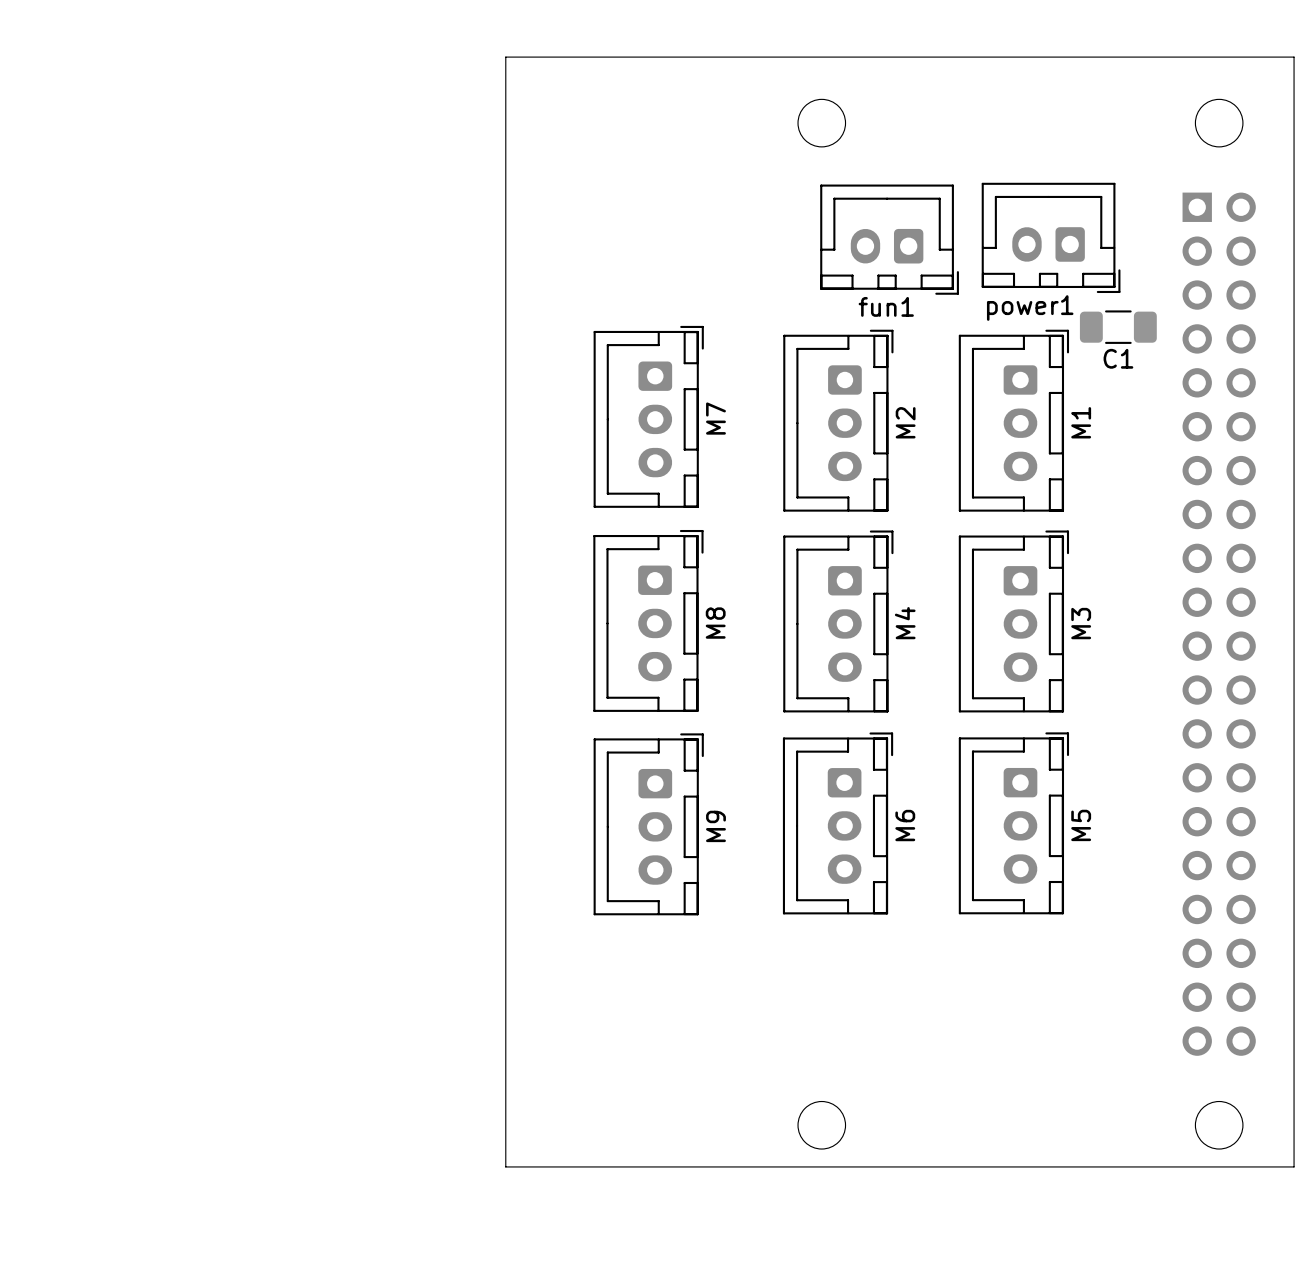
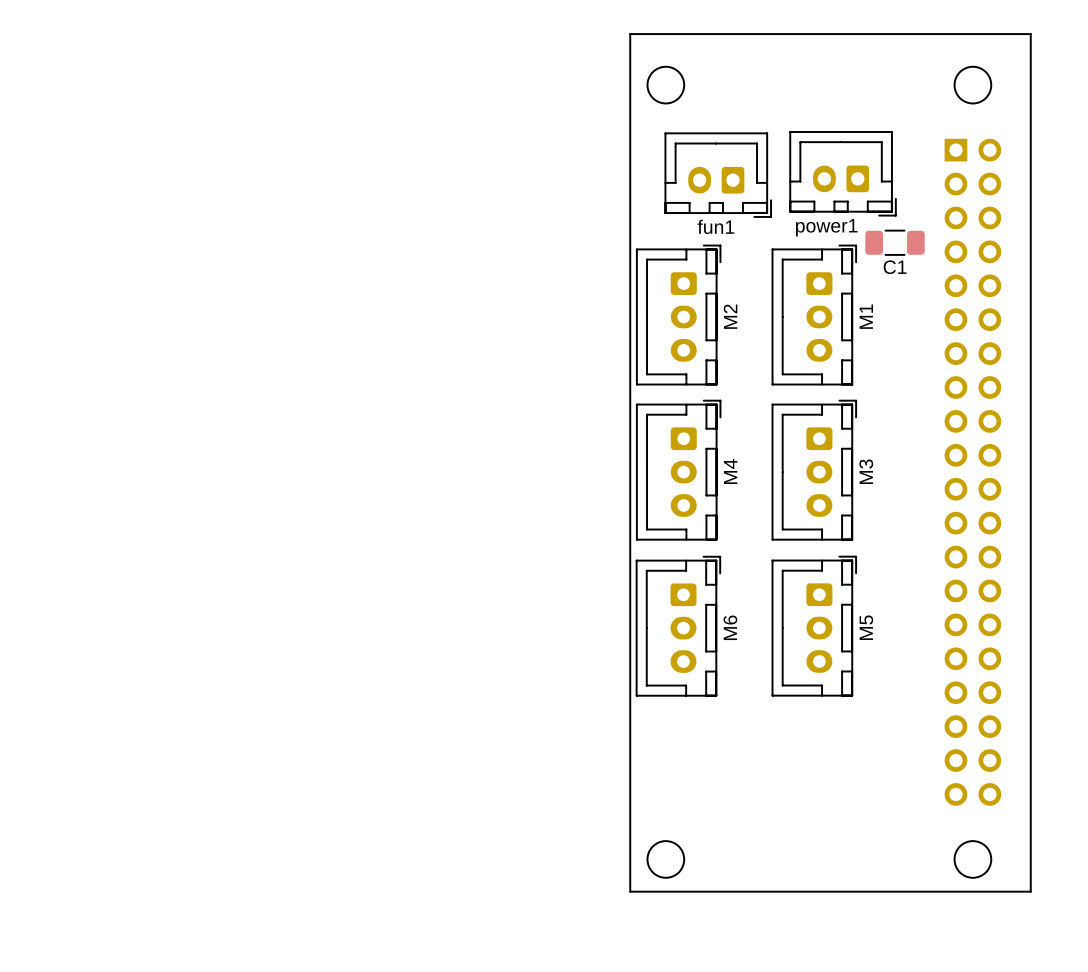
board edge: (775, 57) (505, 57) (505, 1166) (775, 1166) -> (630, 34) (630, 891)
M7: (648, 416) -> none
M8: (648, 620) -> none
M9: (648, 824) -> none

